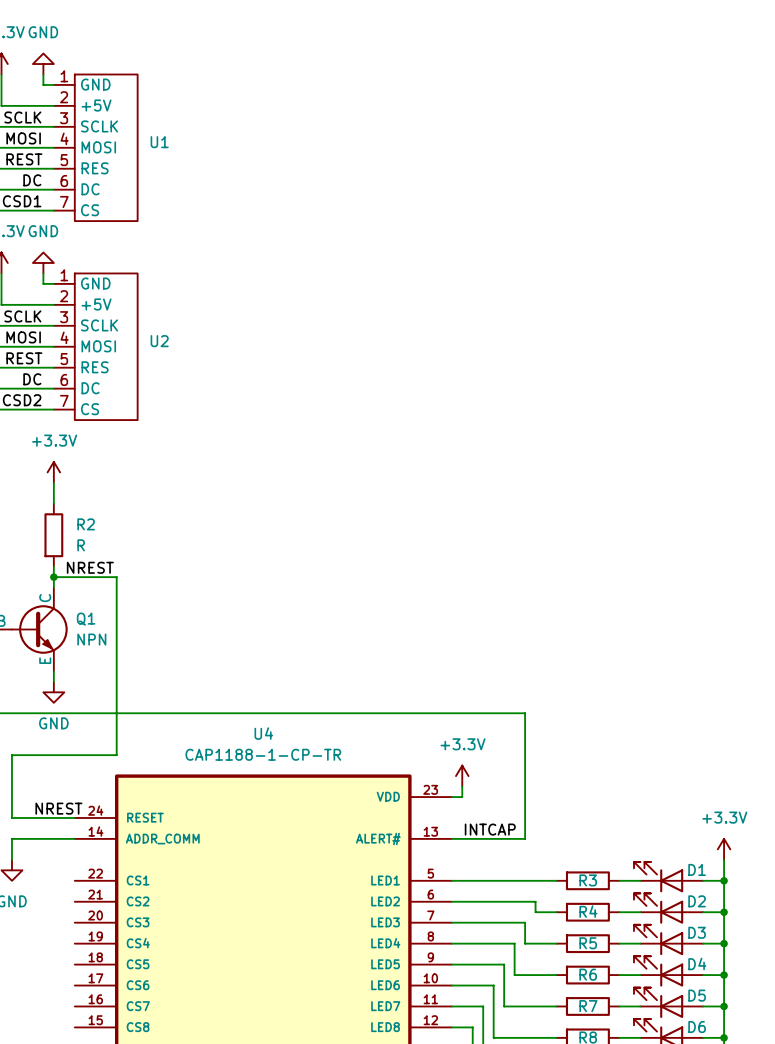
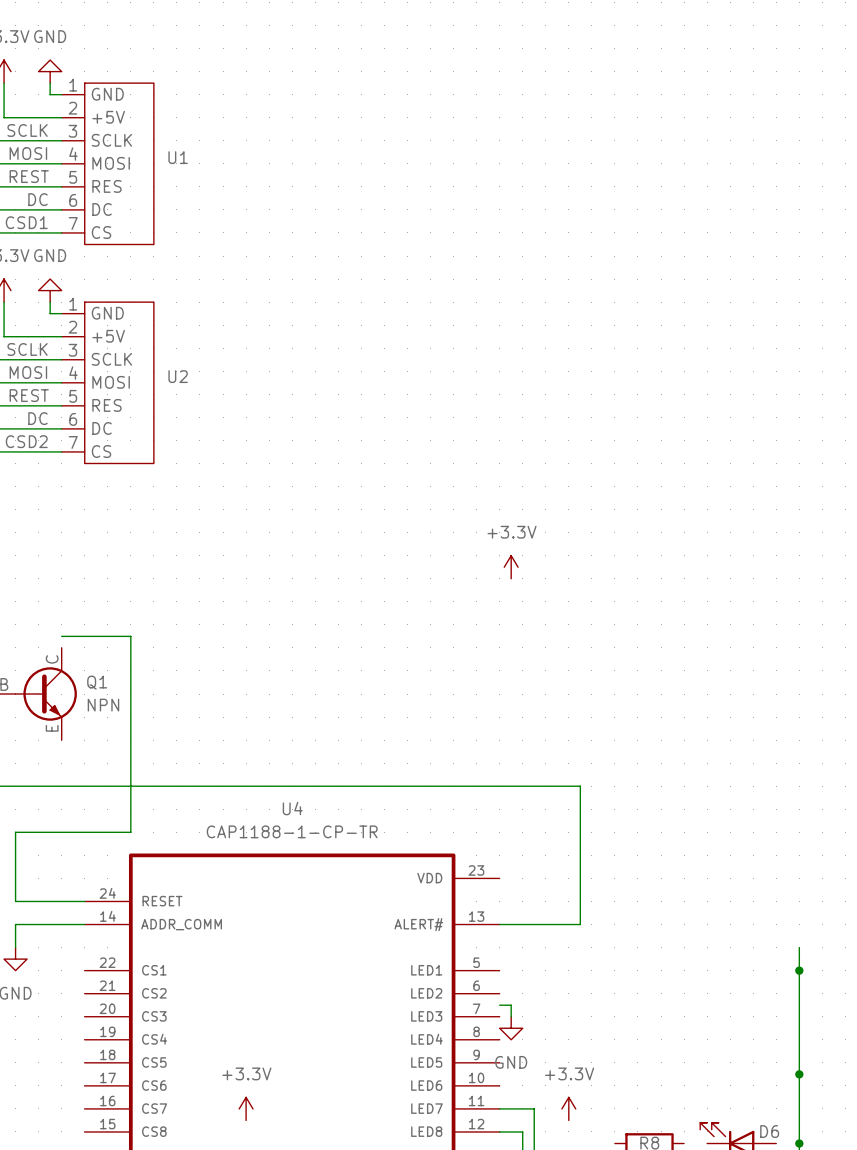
power symbol: +3.3V (53, 472) -> none
wire: (53, 482) (53, 503) -> none
power symbol: none -> +3.3V (511, 567)
R2: R (53, 535) -> none
wire: (53, 566) (53, 587) -> none
label: NREST (90, 567) -> none
junction: (53, 577) -> none
wire: (53, 671) (53, 681) -> none
power symbol: GND (53, 692) -> none
power symbol: +3.3V (462, 776) -> none
wire: (462, 786) (462, 797) (451, 797) -> none
label: NREST (58, 808) -> none
label: INTCAP (490, 829) -> none
power symbol: +3.3V (724, 849) -> none
D1: (668, 877) -> none
wire: (451, 880) (556, 880) -> none
R3: (587, 880) -> none
wire: (619, 880) (640, 880) -> none
wire: (703, 880) (724, 880) -> none
wire: (451, 901) (535, 901) (535, 912) (556, 912) -> none
D2: (668, 908) -> none
wire: none -> (499, 1005) (511, 1005) (511, 1016)
R4: (587, 912) -> none
wire: (619, 912) (640, 912) -> none
wire: (703, 912) (724, 912) -> none
junction: (724, 912) -> none
wire: (451, 922) (525, 922) (525, 943) (556, 943) -> none
power symbol: none -> GND (511, 1028)
D3: (668, 939) -> none
wire: (451, 943) (514, 943) (514, 975) (556, 975) -> none
R5: (587, 943) -> none
wire: (619, 943) (640, 943) -> none
wire: (703, 943) (724, 943) -> none
junction: (724, 943) -> none
wire: (451, 964) (504, 964) (504, 1006) (556, 1006) -> none
D4: (668, 971) -> none
R6: (587, 975) -> none
wire: (619, 975) (640, 975) -> none
wire: (703, 975) (724, 975) -> none
wire: (451, 985) (493, 985) (493, 1037) (556, 1037) -> none
D5: (668, 1002) -> none
power symbol: none -> +3.3V (246, 1108)
power symbol: none -> +3.3V (568, 1108)
R7: (587, 1006) -> none
wire: (619, 1006) (640, 1006) -> none
wire: (703, 1006) (724, 1006) -> none
junction: (724, 1006) -> none
wire: (619, 1037) (640, 1037) -> none
wire: (703, 1037) (724, 1037) -> none

